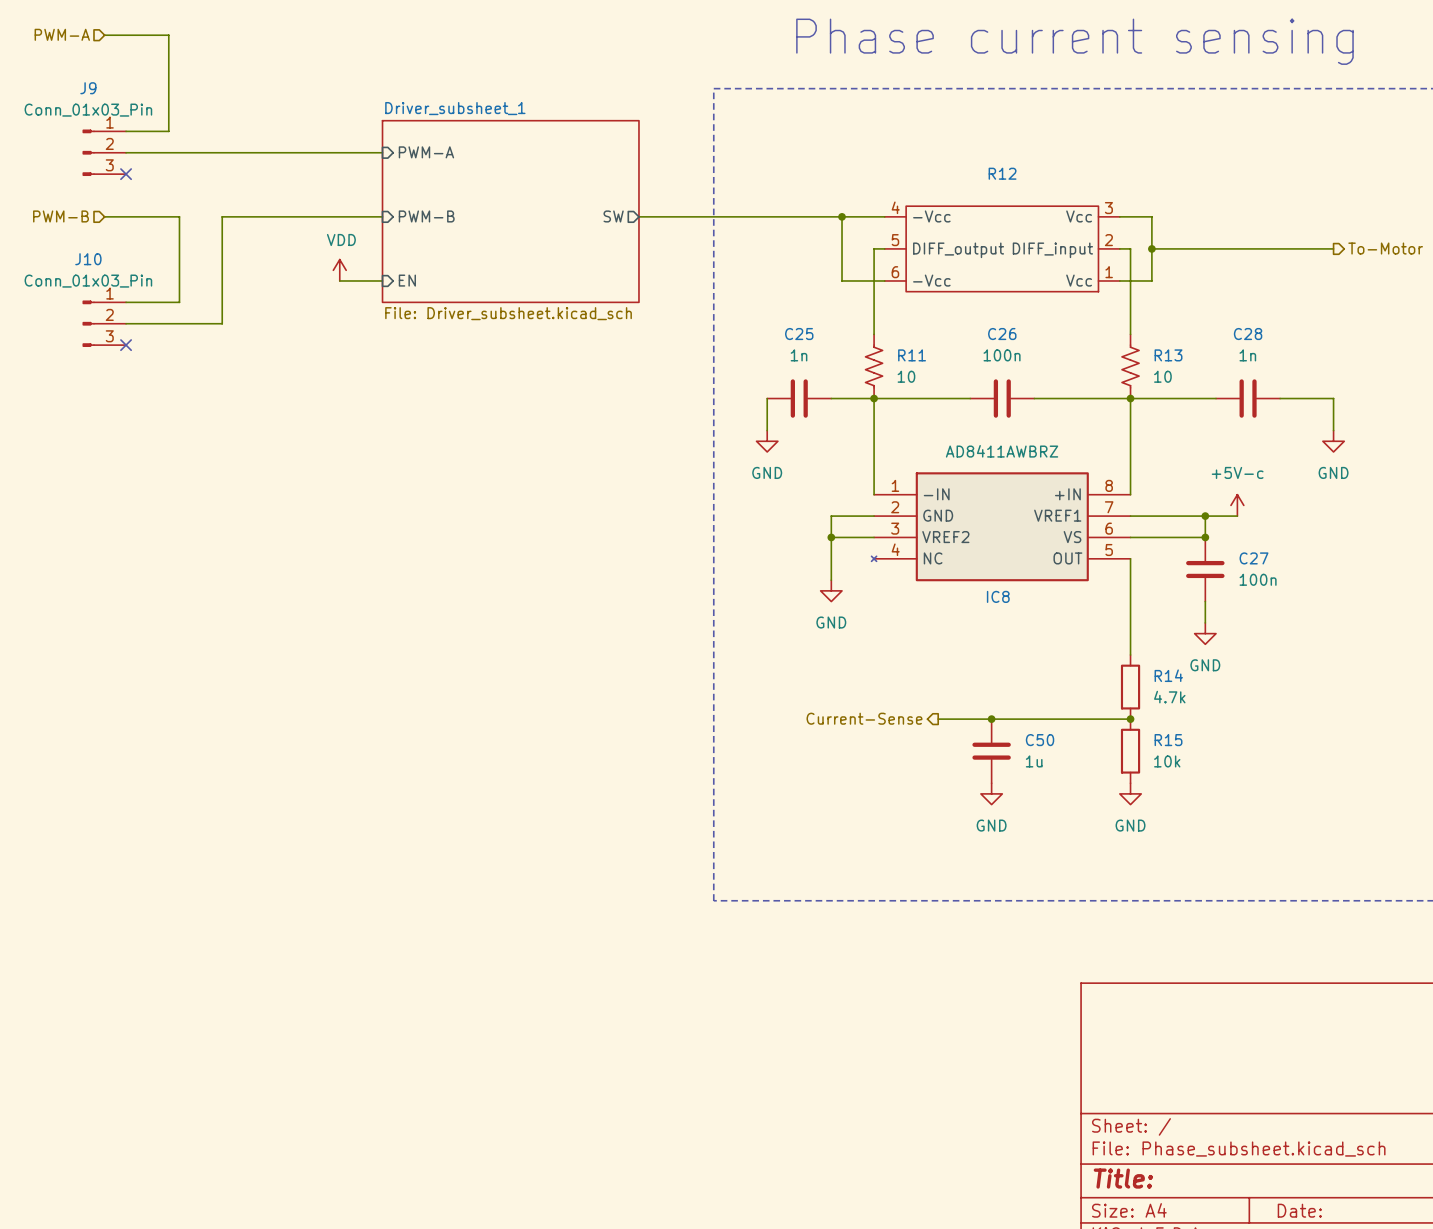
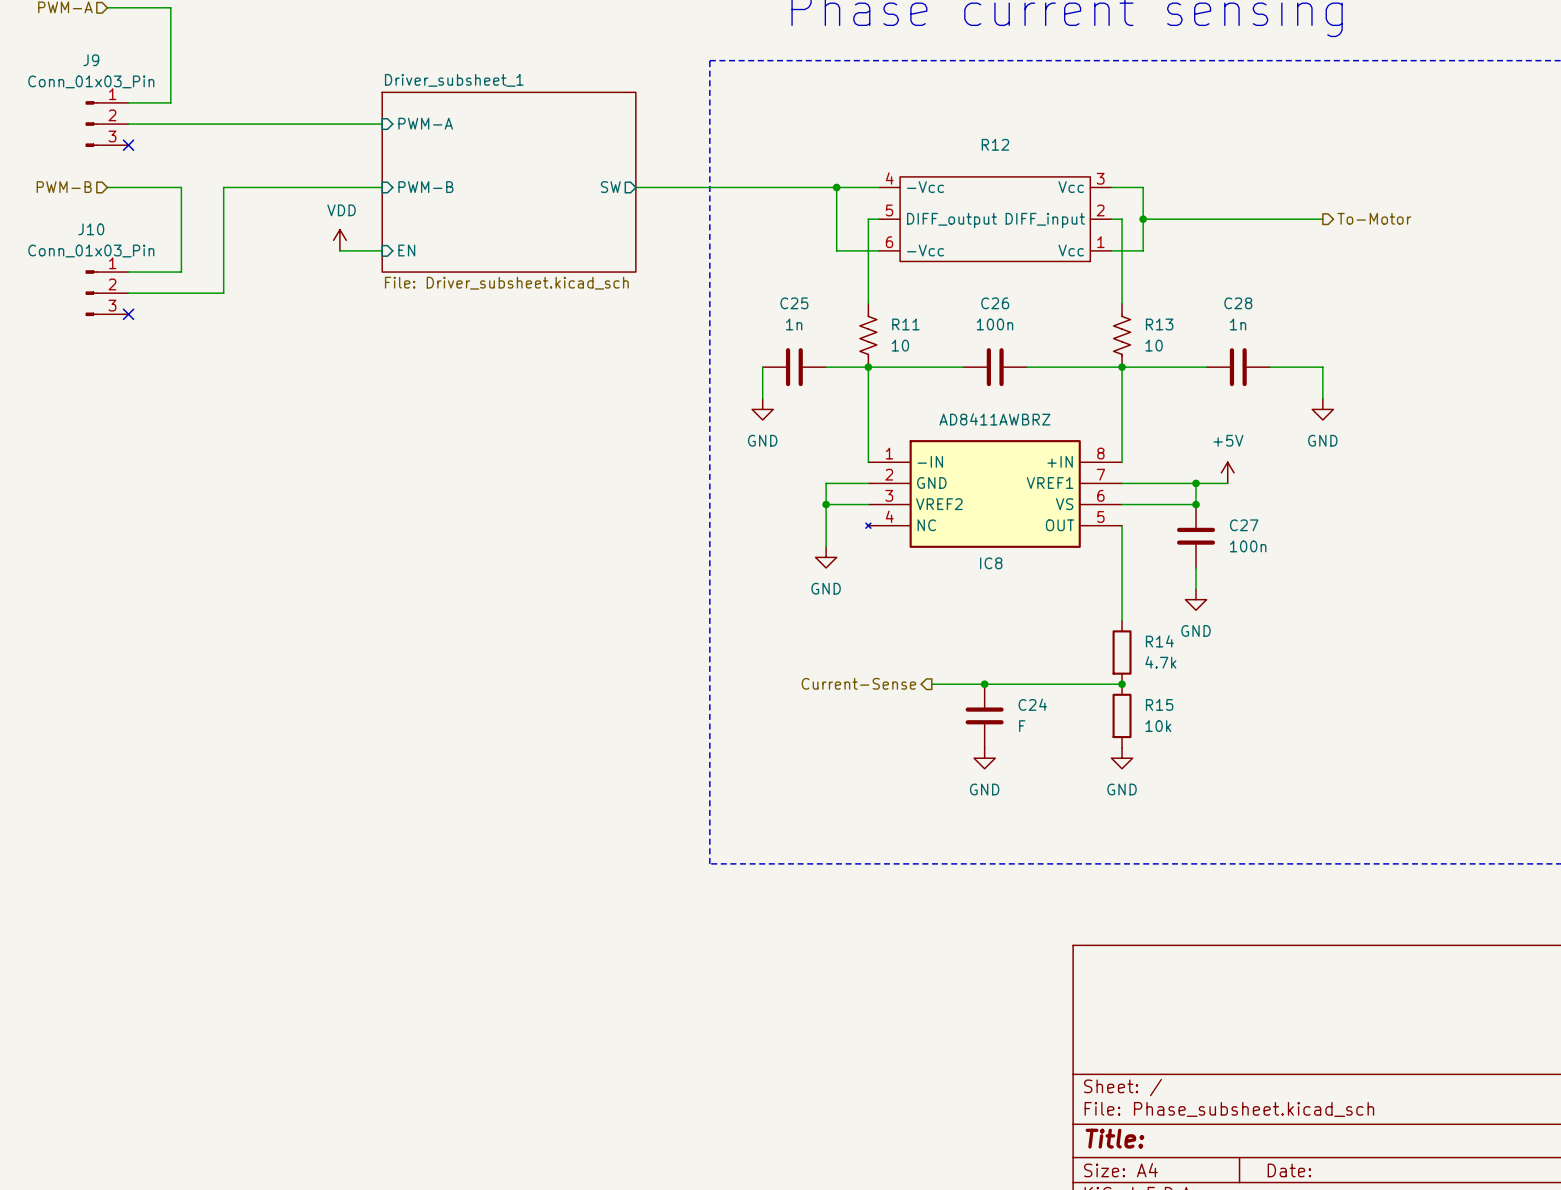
power symbol: +5V-c (1237, 505) -> +5V (1227, 472)
C50 name: C50 (1040, 740) -> C24 (1032, 704)
C50 value: 1u (1034, 761) -> F (1022, 726)

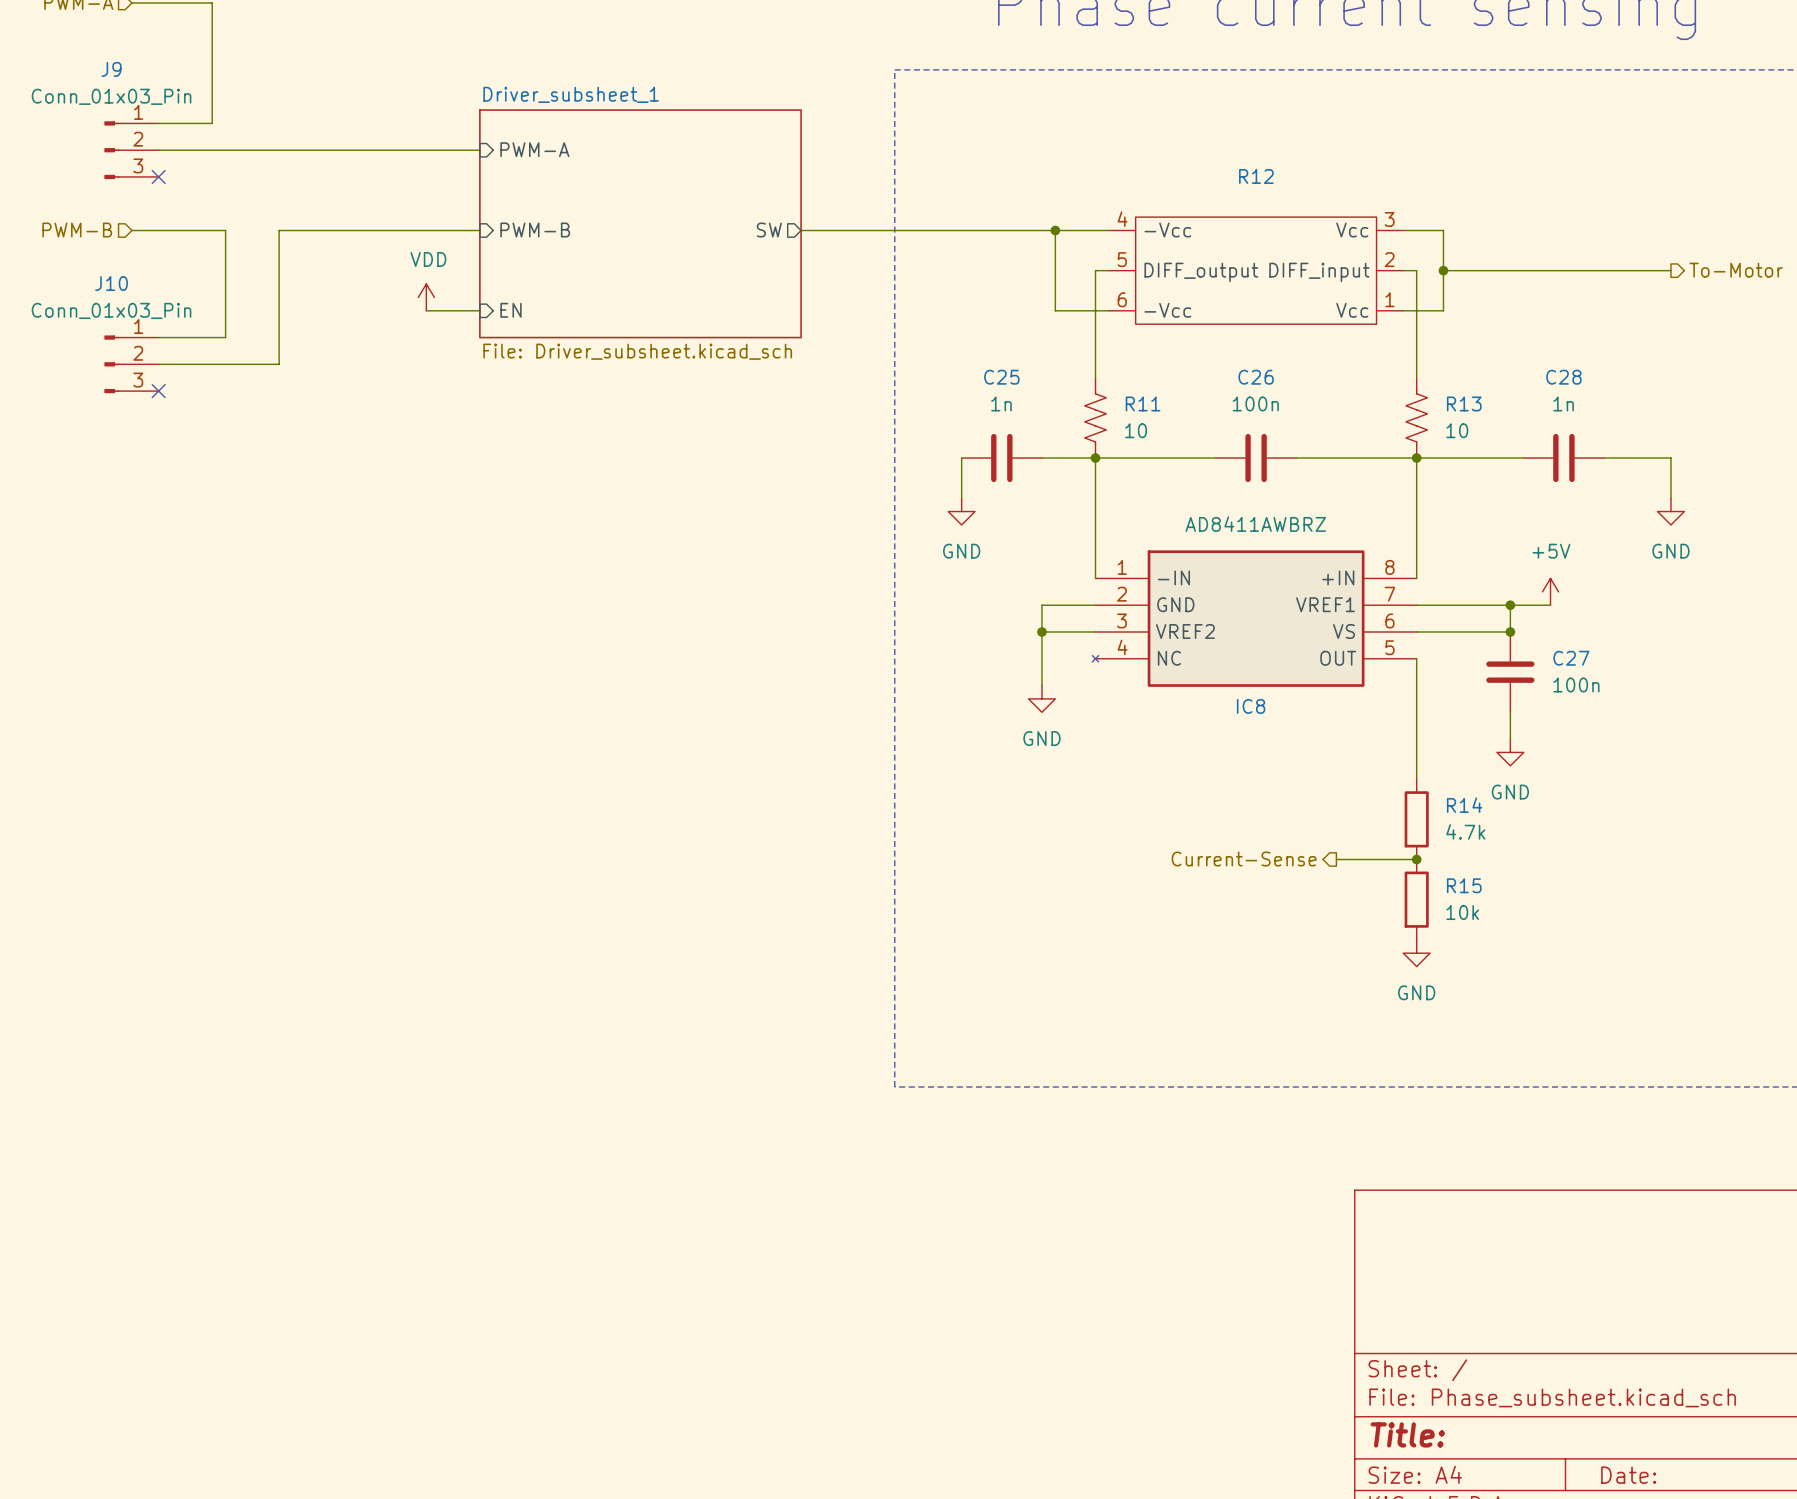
hierarchical label position: Current-Sense (858, 683) -> Current-Sense (1244, 859)
wire: (931, 684) (1058, 684) -> none
junction: (984, 684) -> none
C24: F (984, 715) -> none
power symbol: GND (984, 758) -> none

